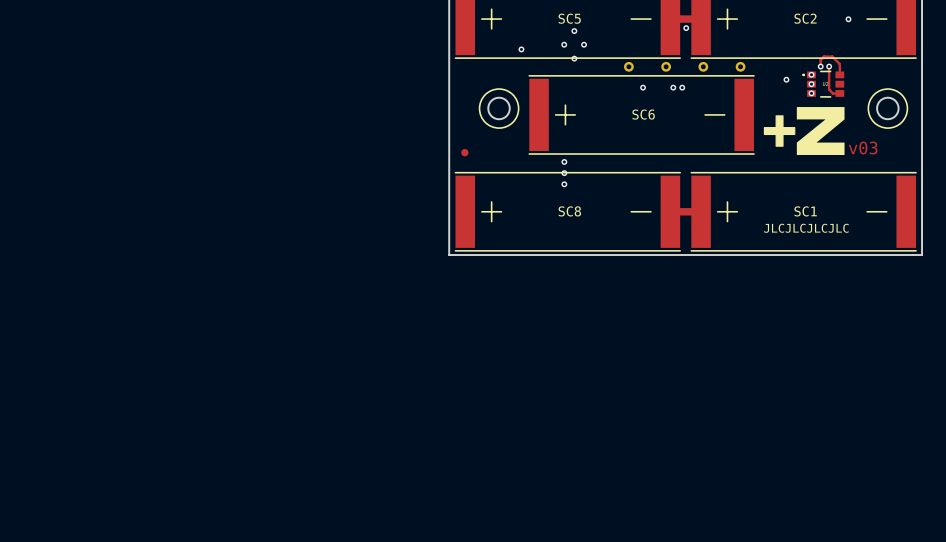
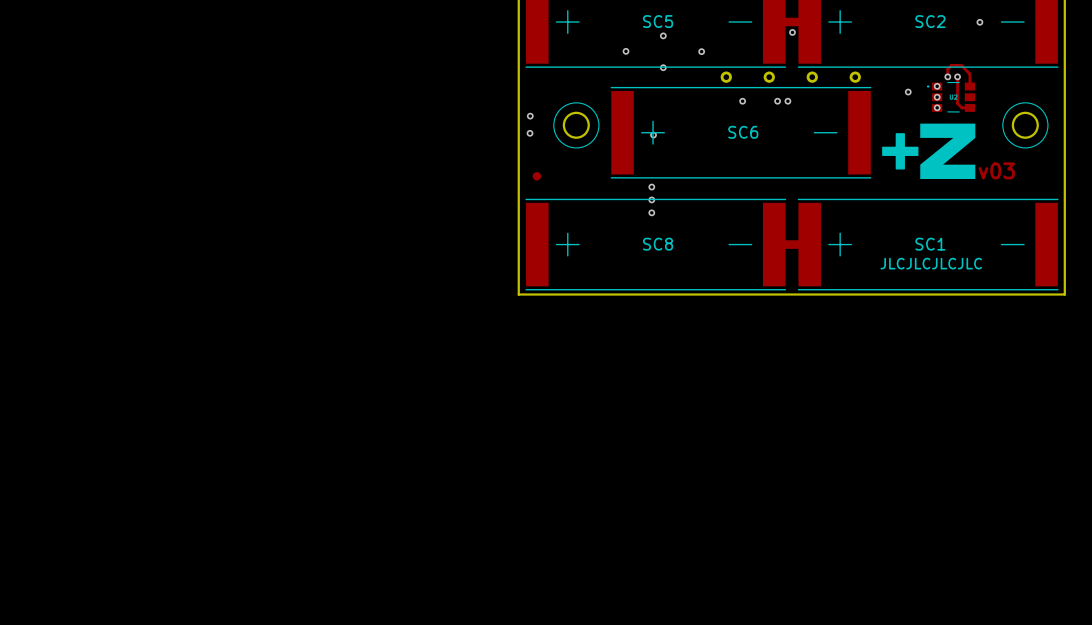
via: none -> (626, 51)
via: (564, 44) -> none
via: (584, 44) -> none
via: none -> (701, 51)
via: (521, 49) -> none
via: none -> (530, 116)
via: none -> (530, 133)
via: none -> (653, 135)

